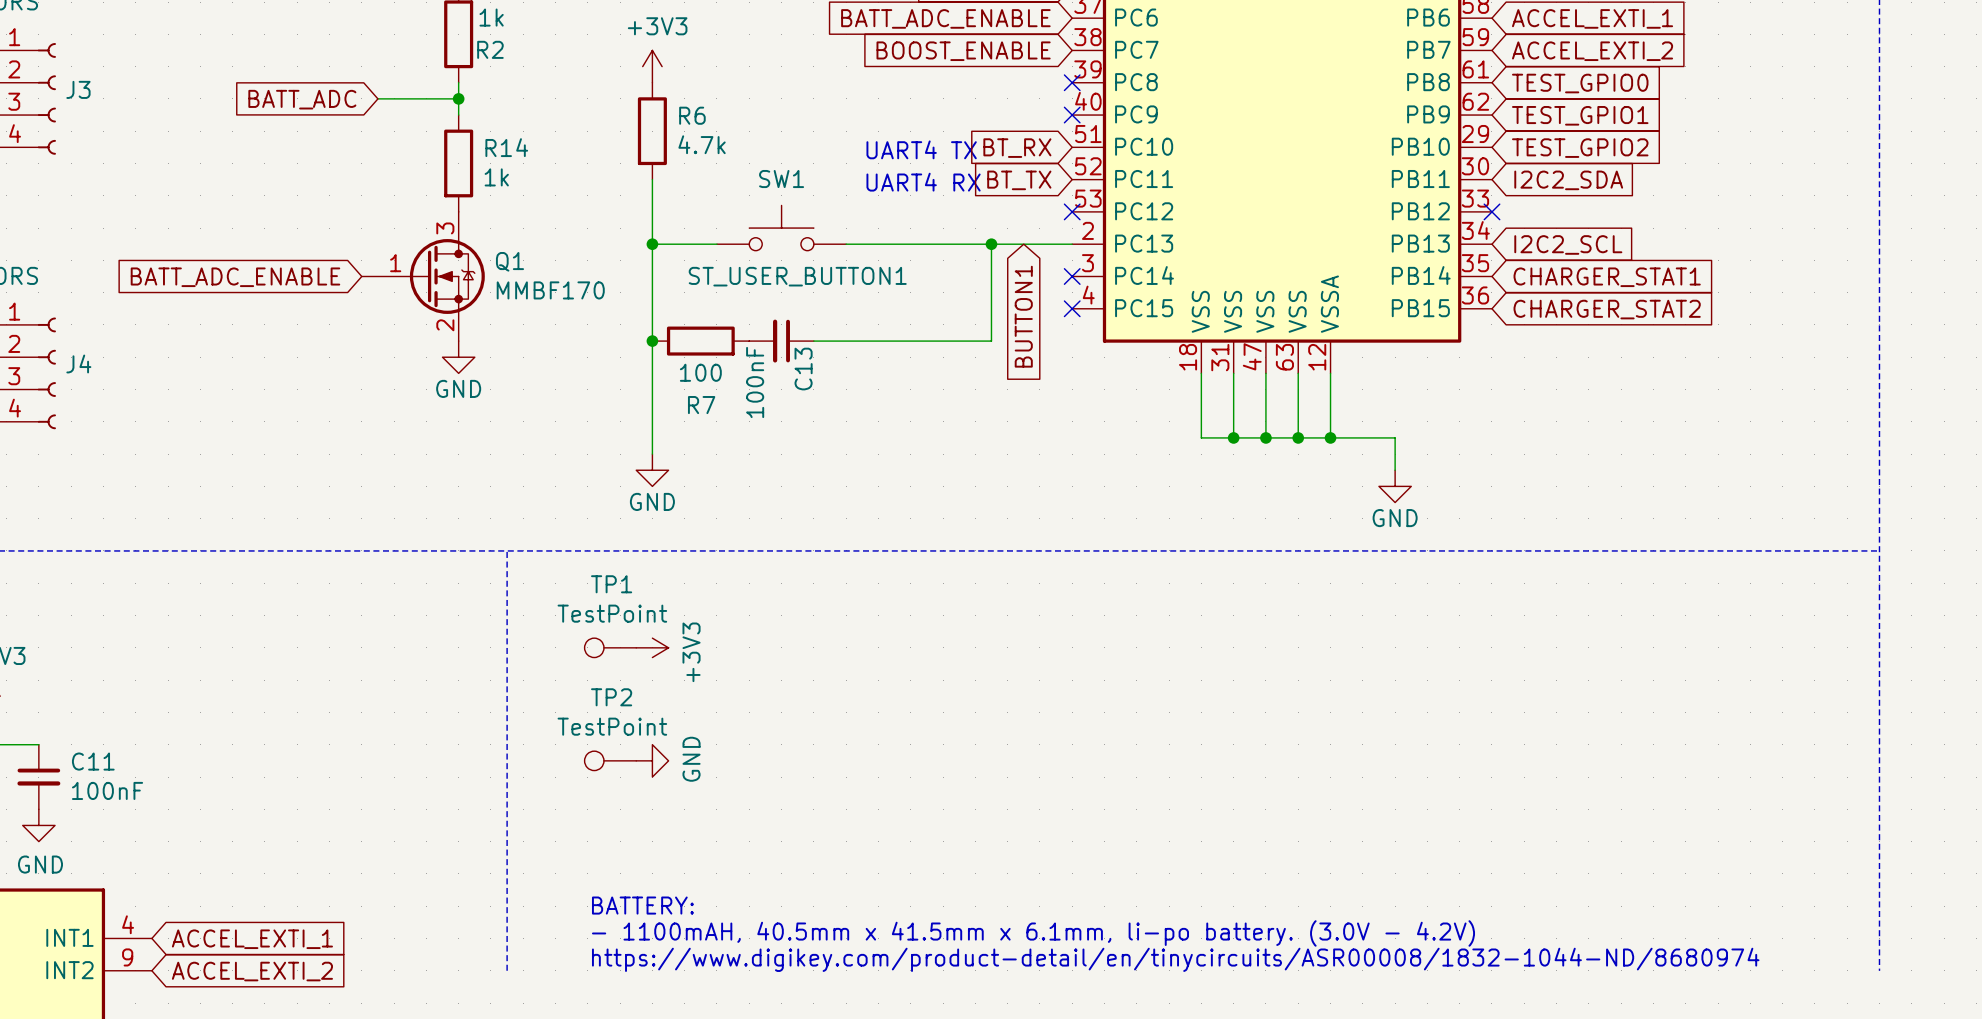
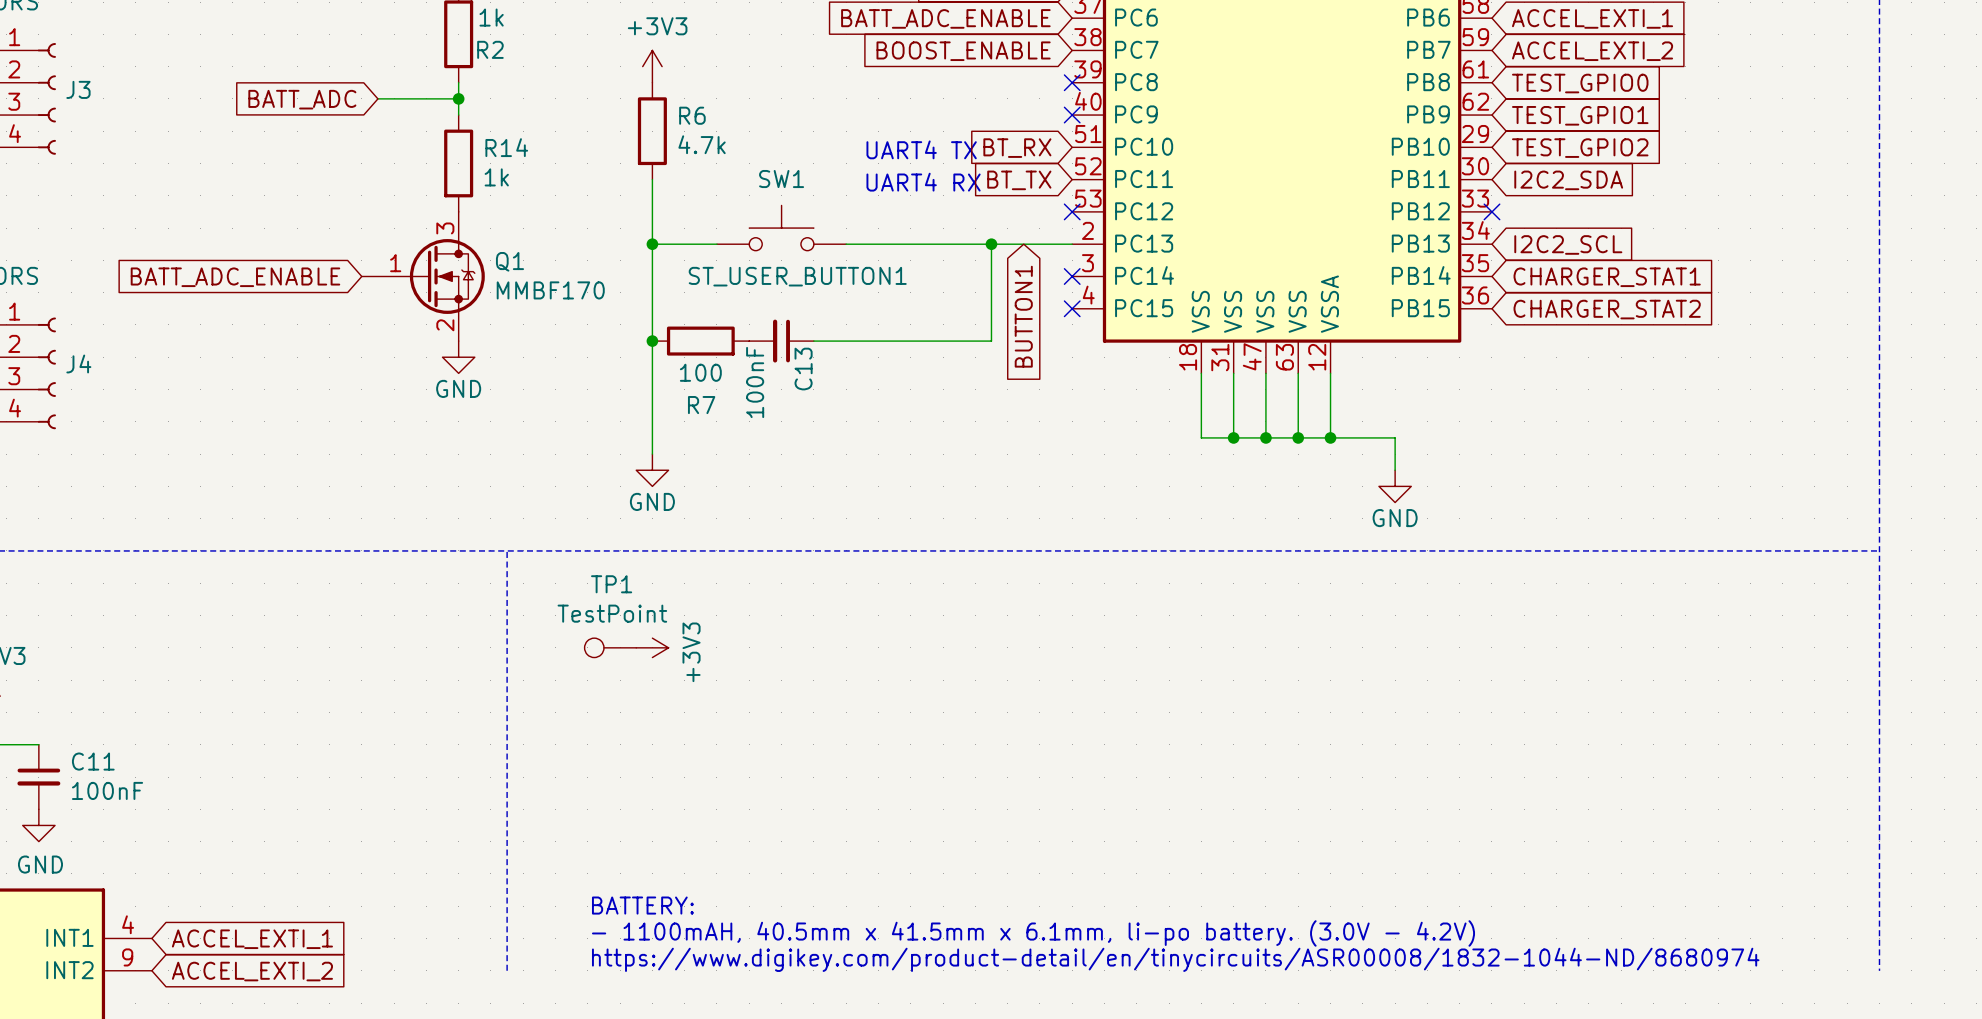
TP2: TestPoint (610, 760) -> none
power symbol: GND (652, 760) -> none

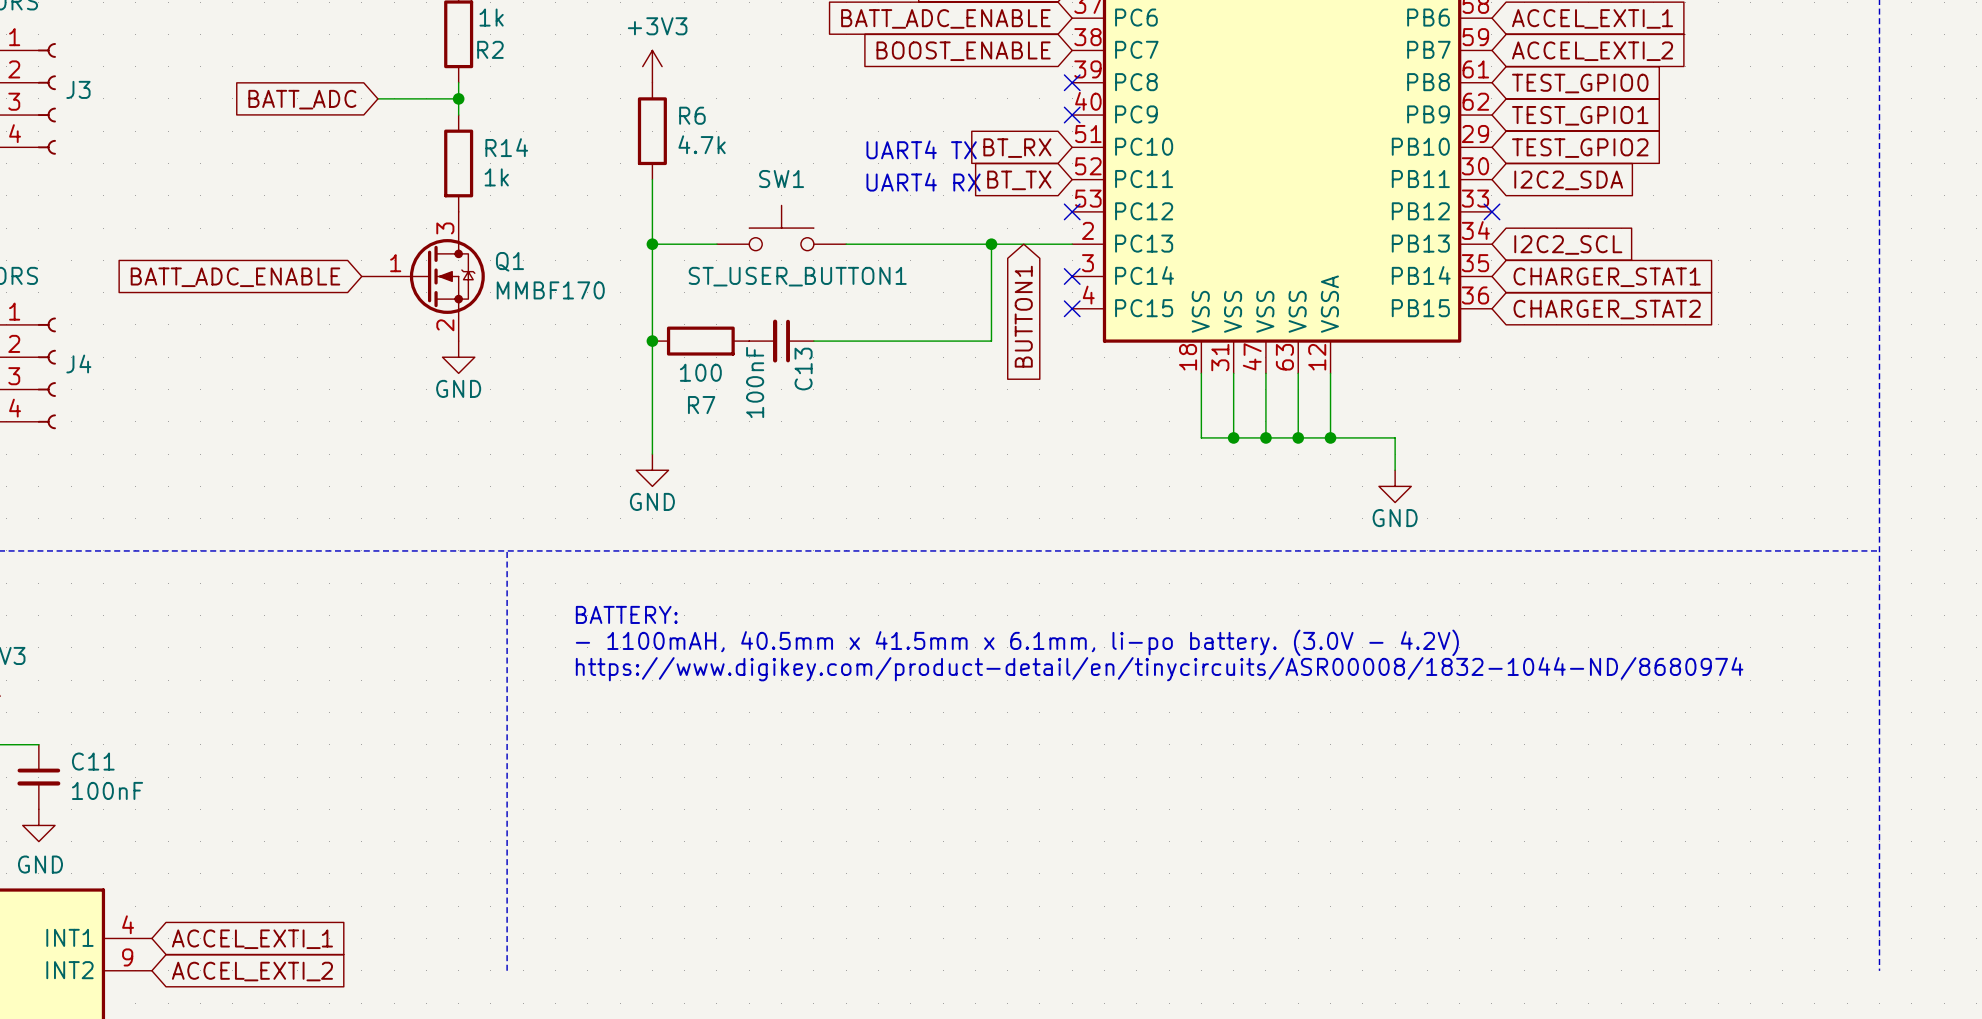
TP1: TestPoint (610, 647) -> none
power symbol: +3V3 (652, 647) -> none
text position: BATTERY: (642, 905) -> BATTERY: (626, 614)
text position: - 1100mAH, 40.5mm x 41.5mm x 6.1mm, li-po battery. (3.0V - 4.2V) (1033, 933) -> - 1100mAH, 40.5mm x 41.5mm x 6.1mm, li-po battery. (3.0V - 4.2V) (1017, 642)
text position: https://www.digikey.com/product-detail/en/tinycircuits/ASR00008/1832-1044-ND/8680974 (1175, 959) -> https://www.digikey.com/product-detail/en/tinycircuits/ASR00008/1832-1044-ND/8680974 (1159, 669)

